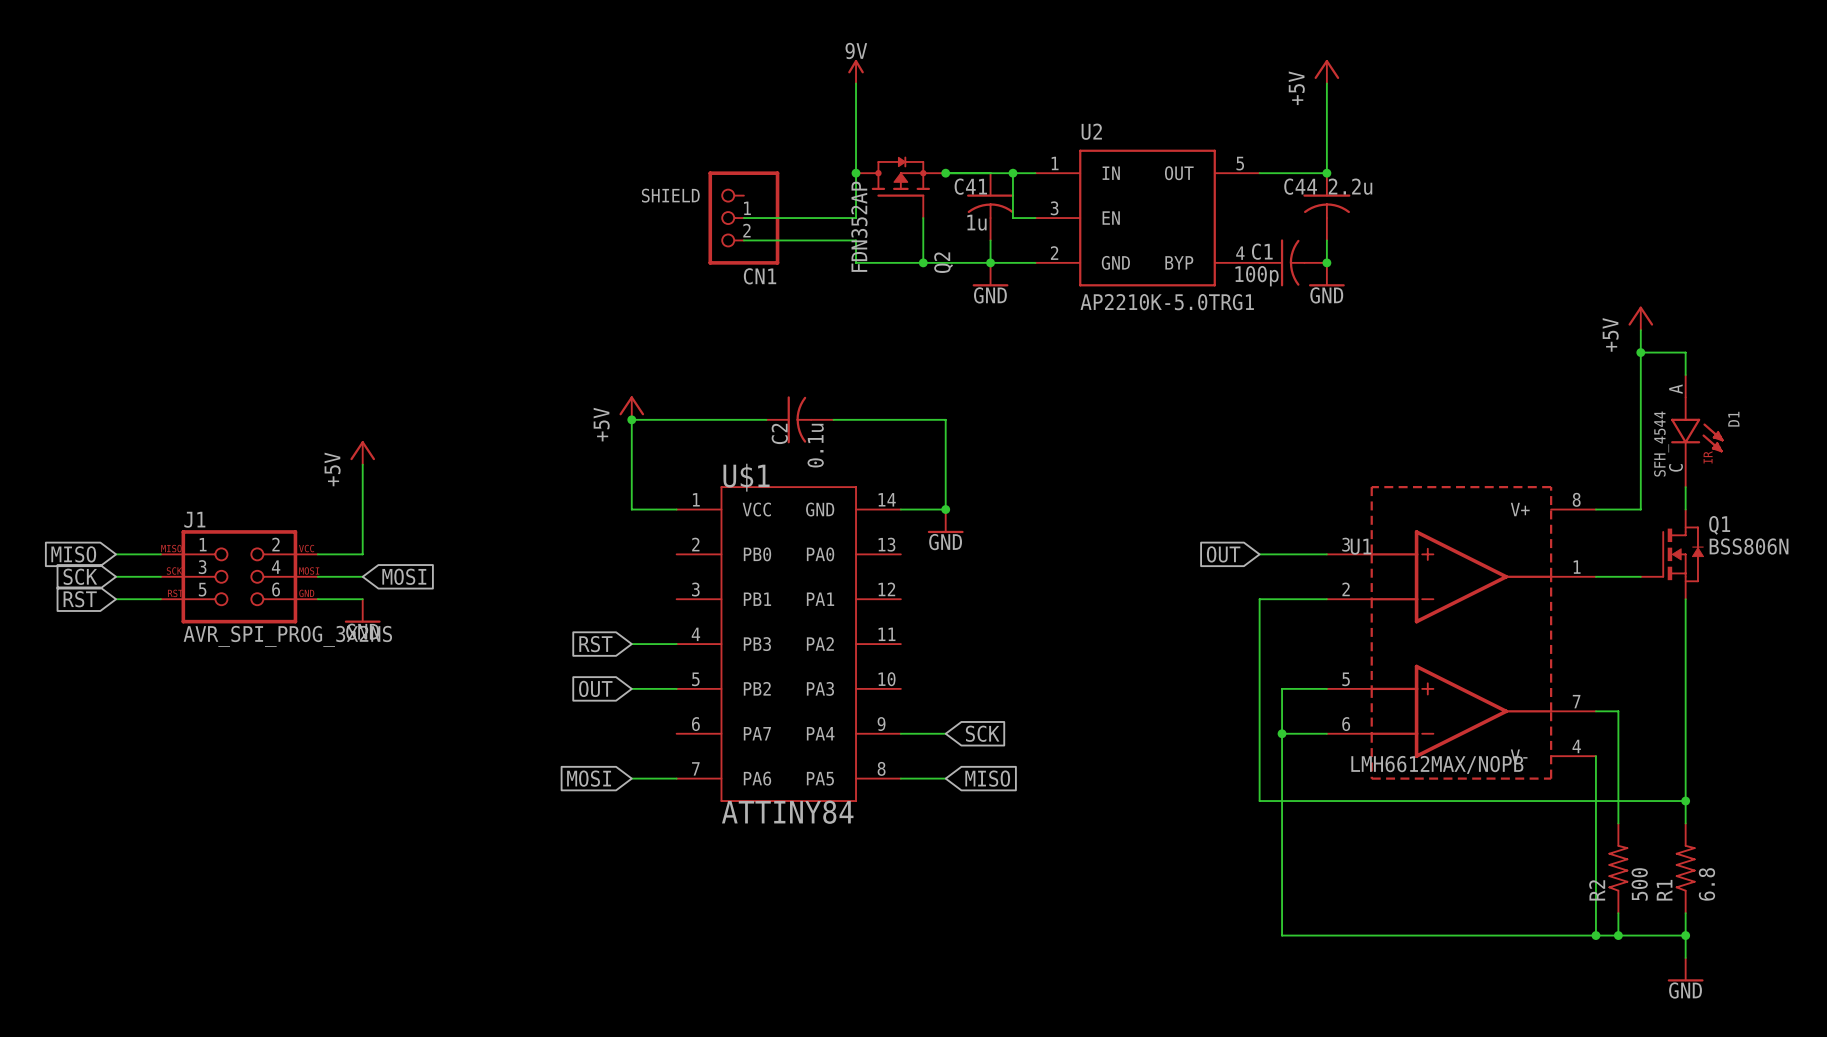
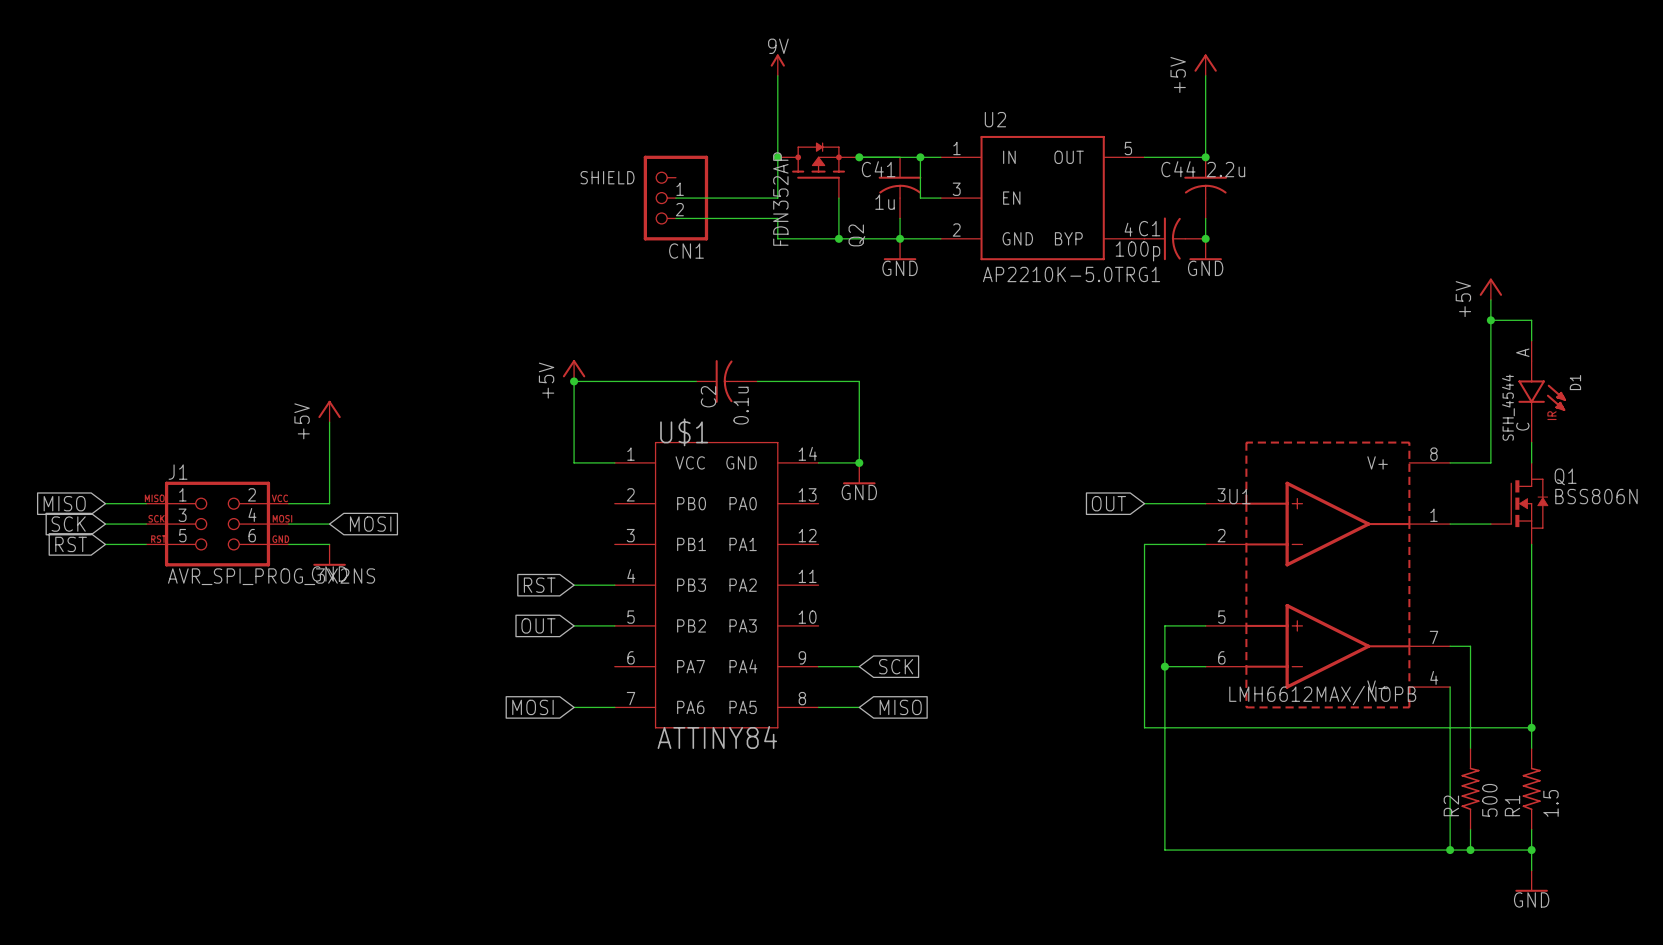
R1 value: 6.8 (1706, 884) -> 1.5 (1550, 803)

